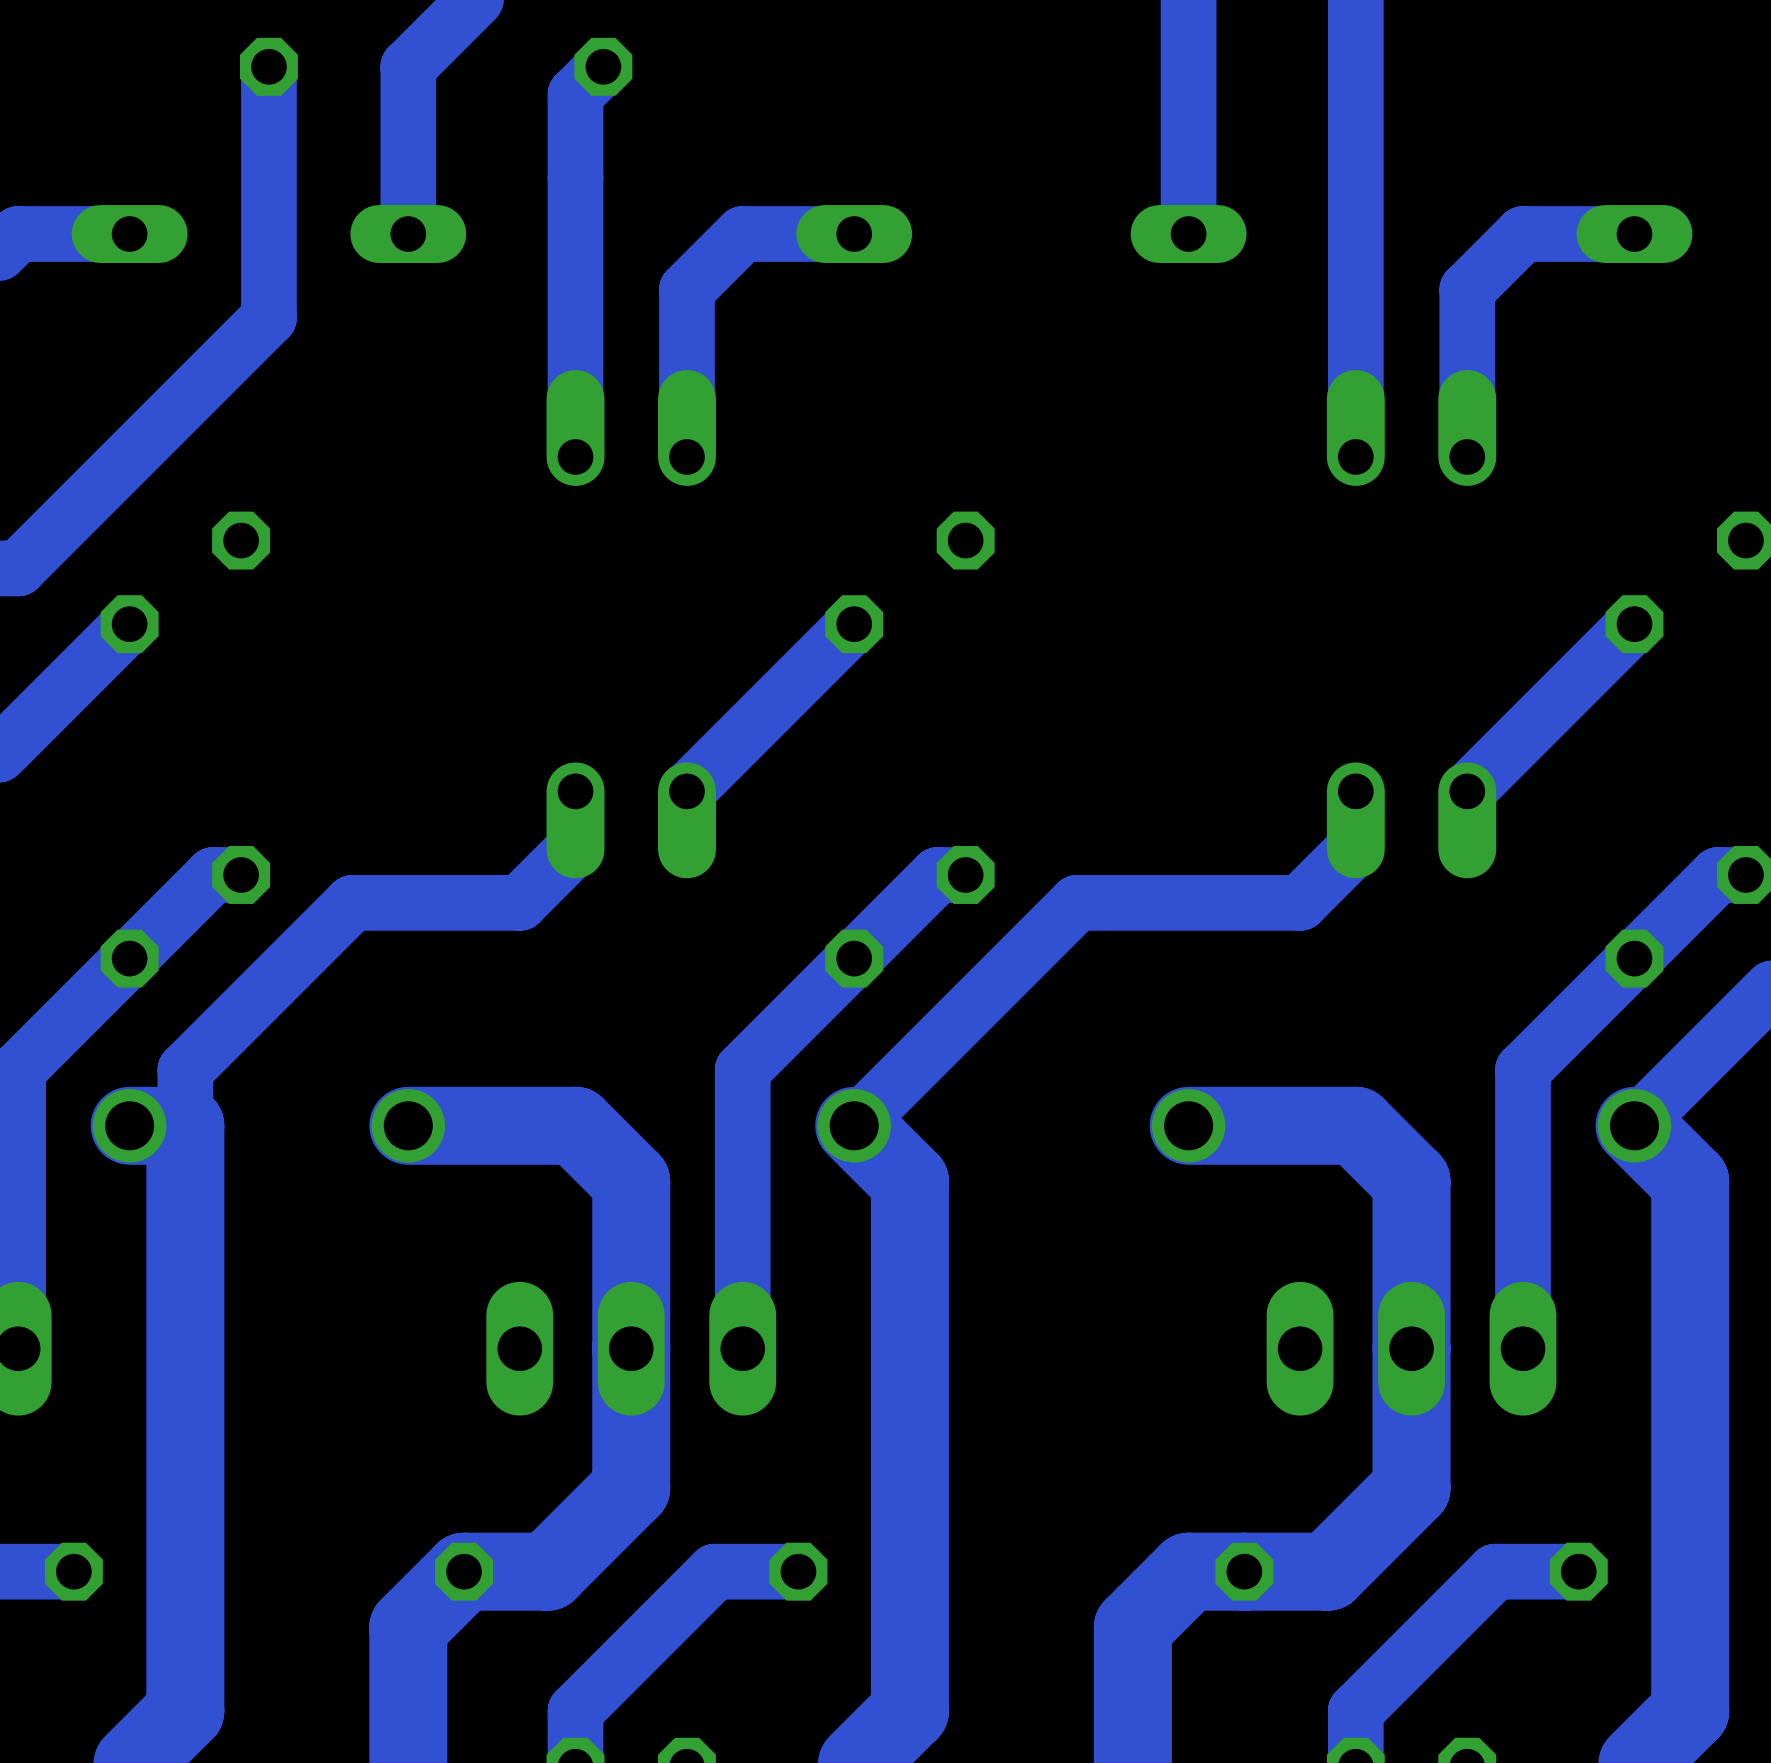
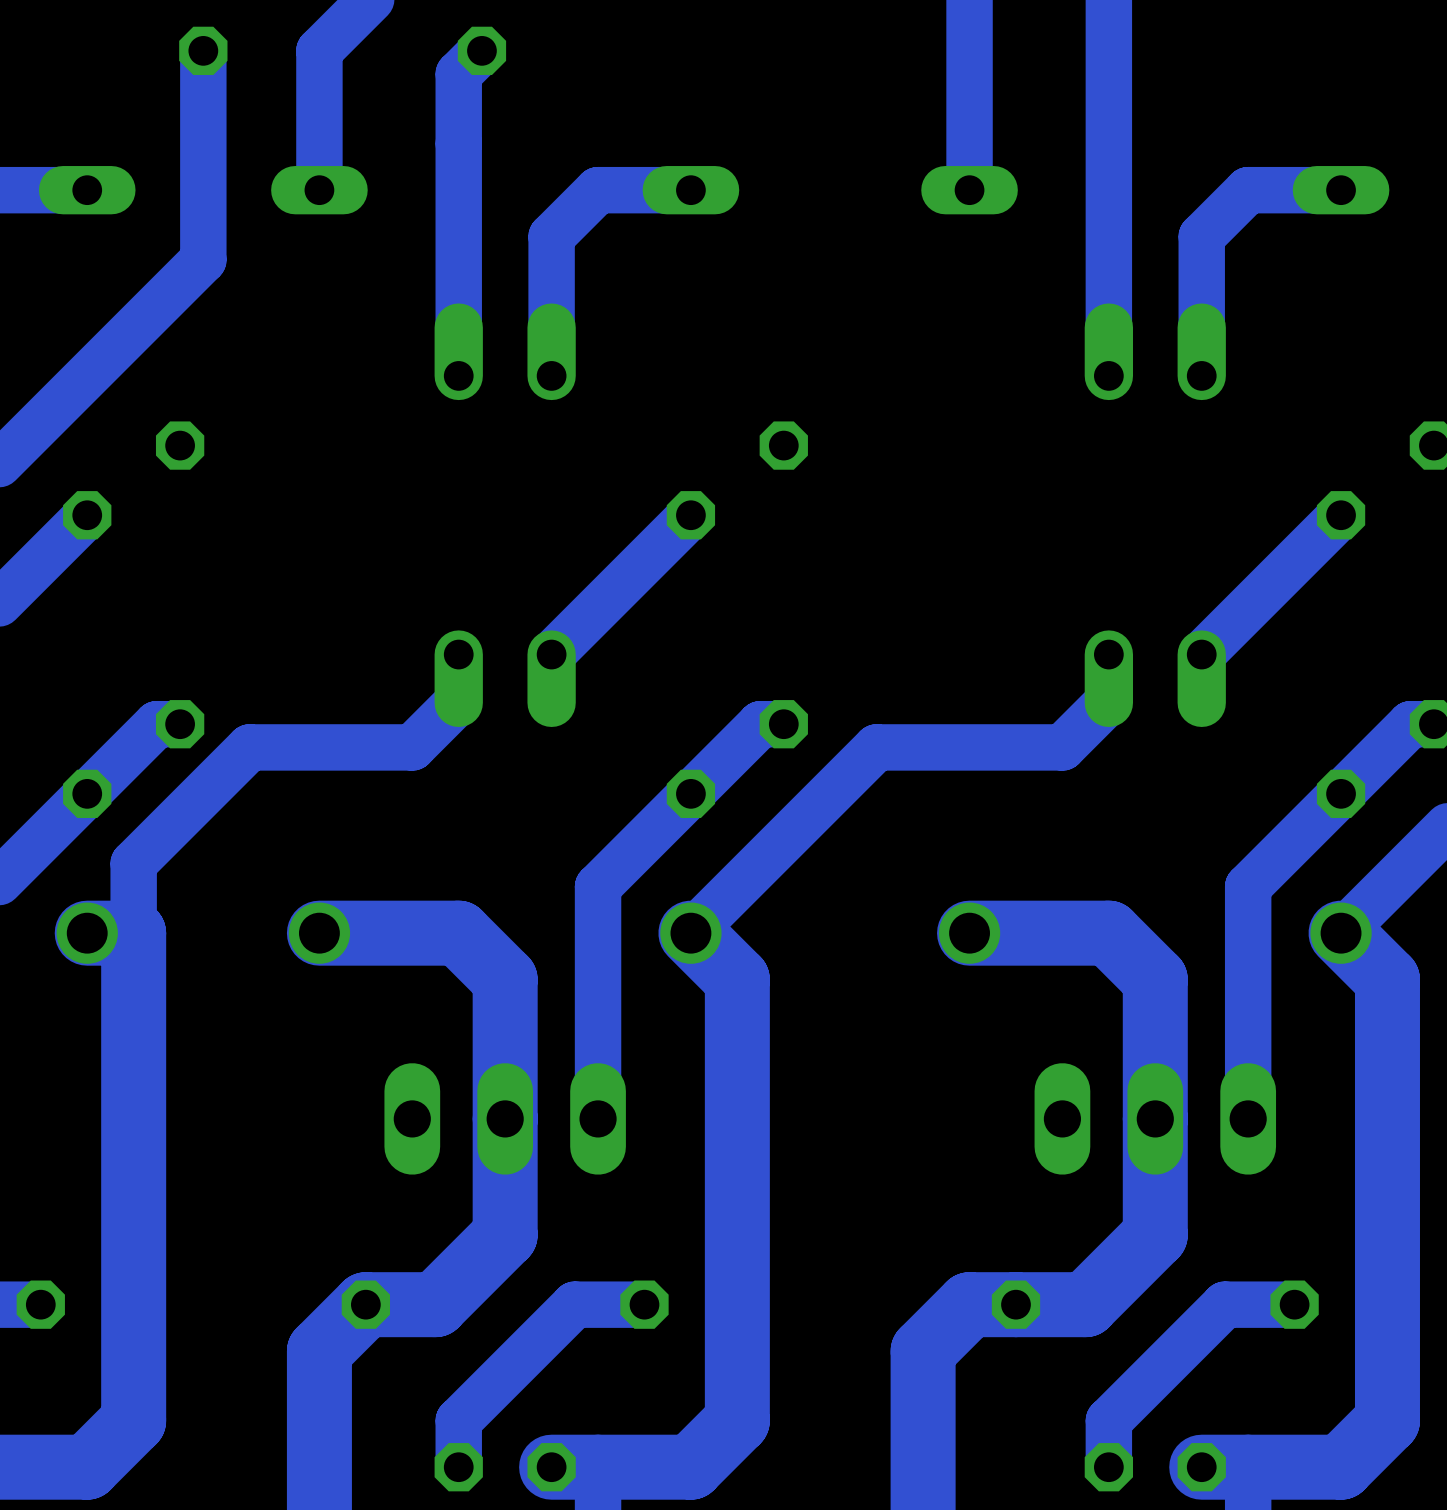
track: (352, 902) (185, 1070) -> (272, 747) (249, 747) (133, 863) (133, 886)

